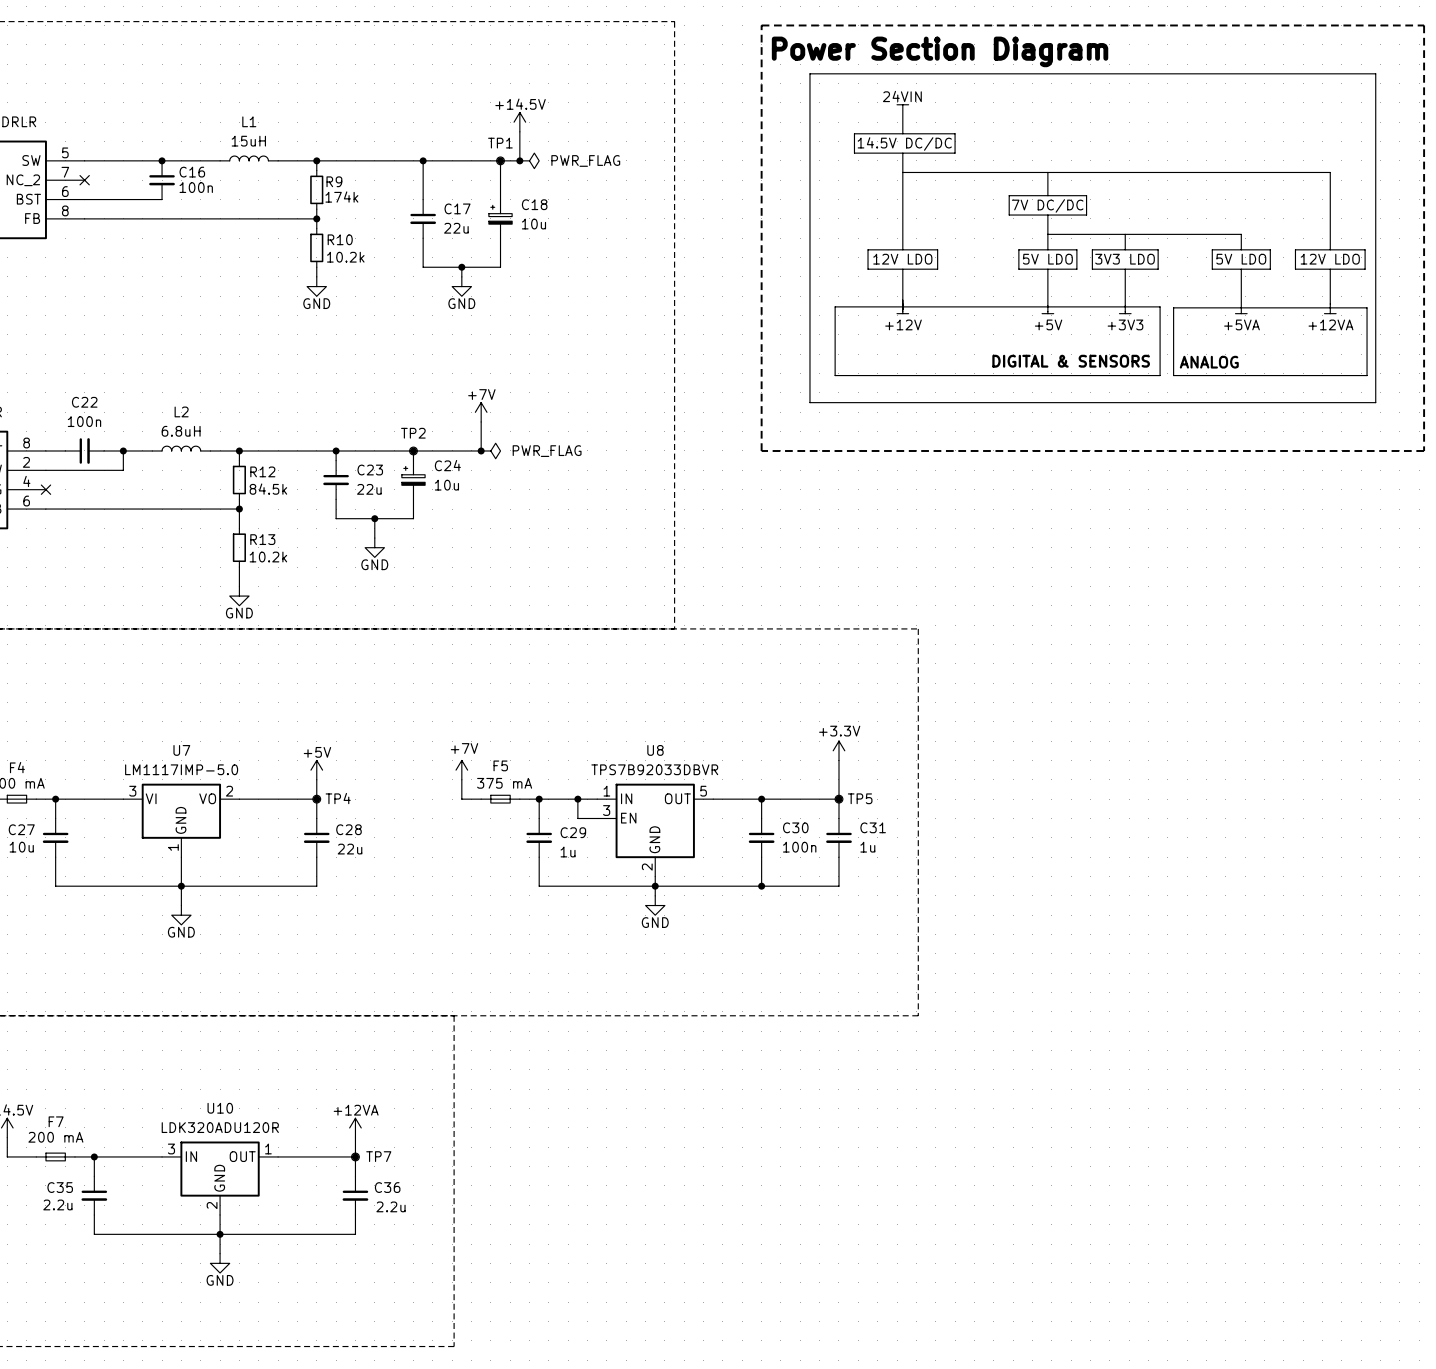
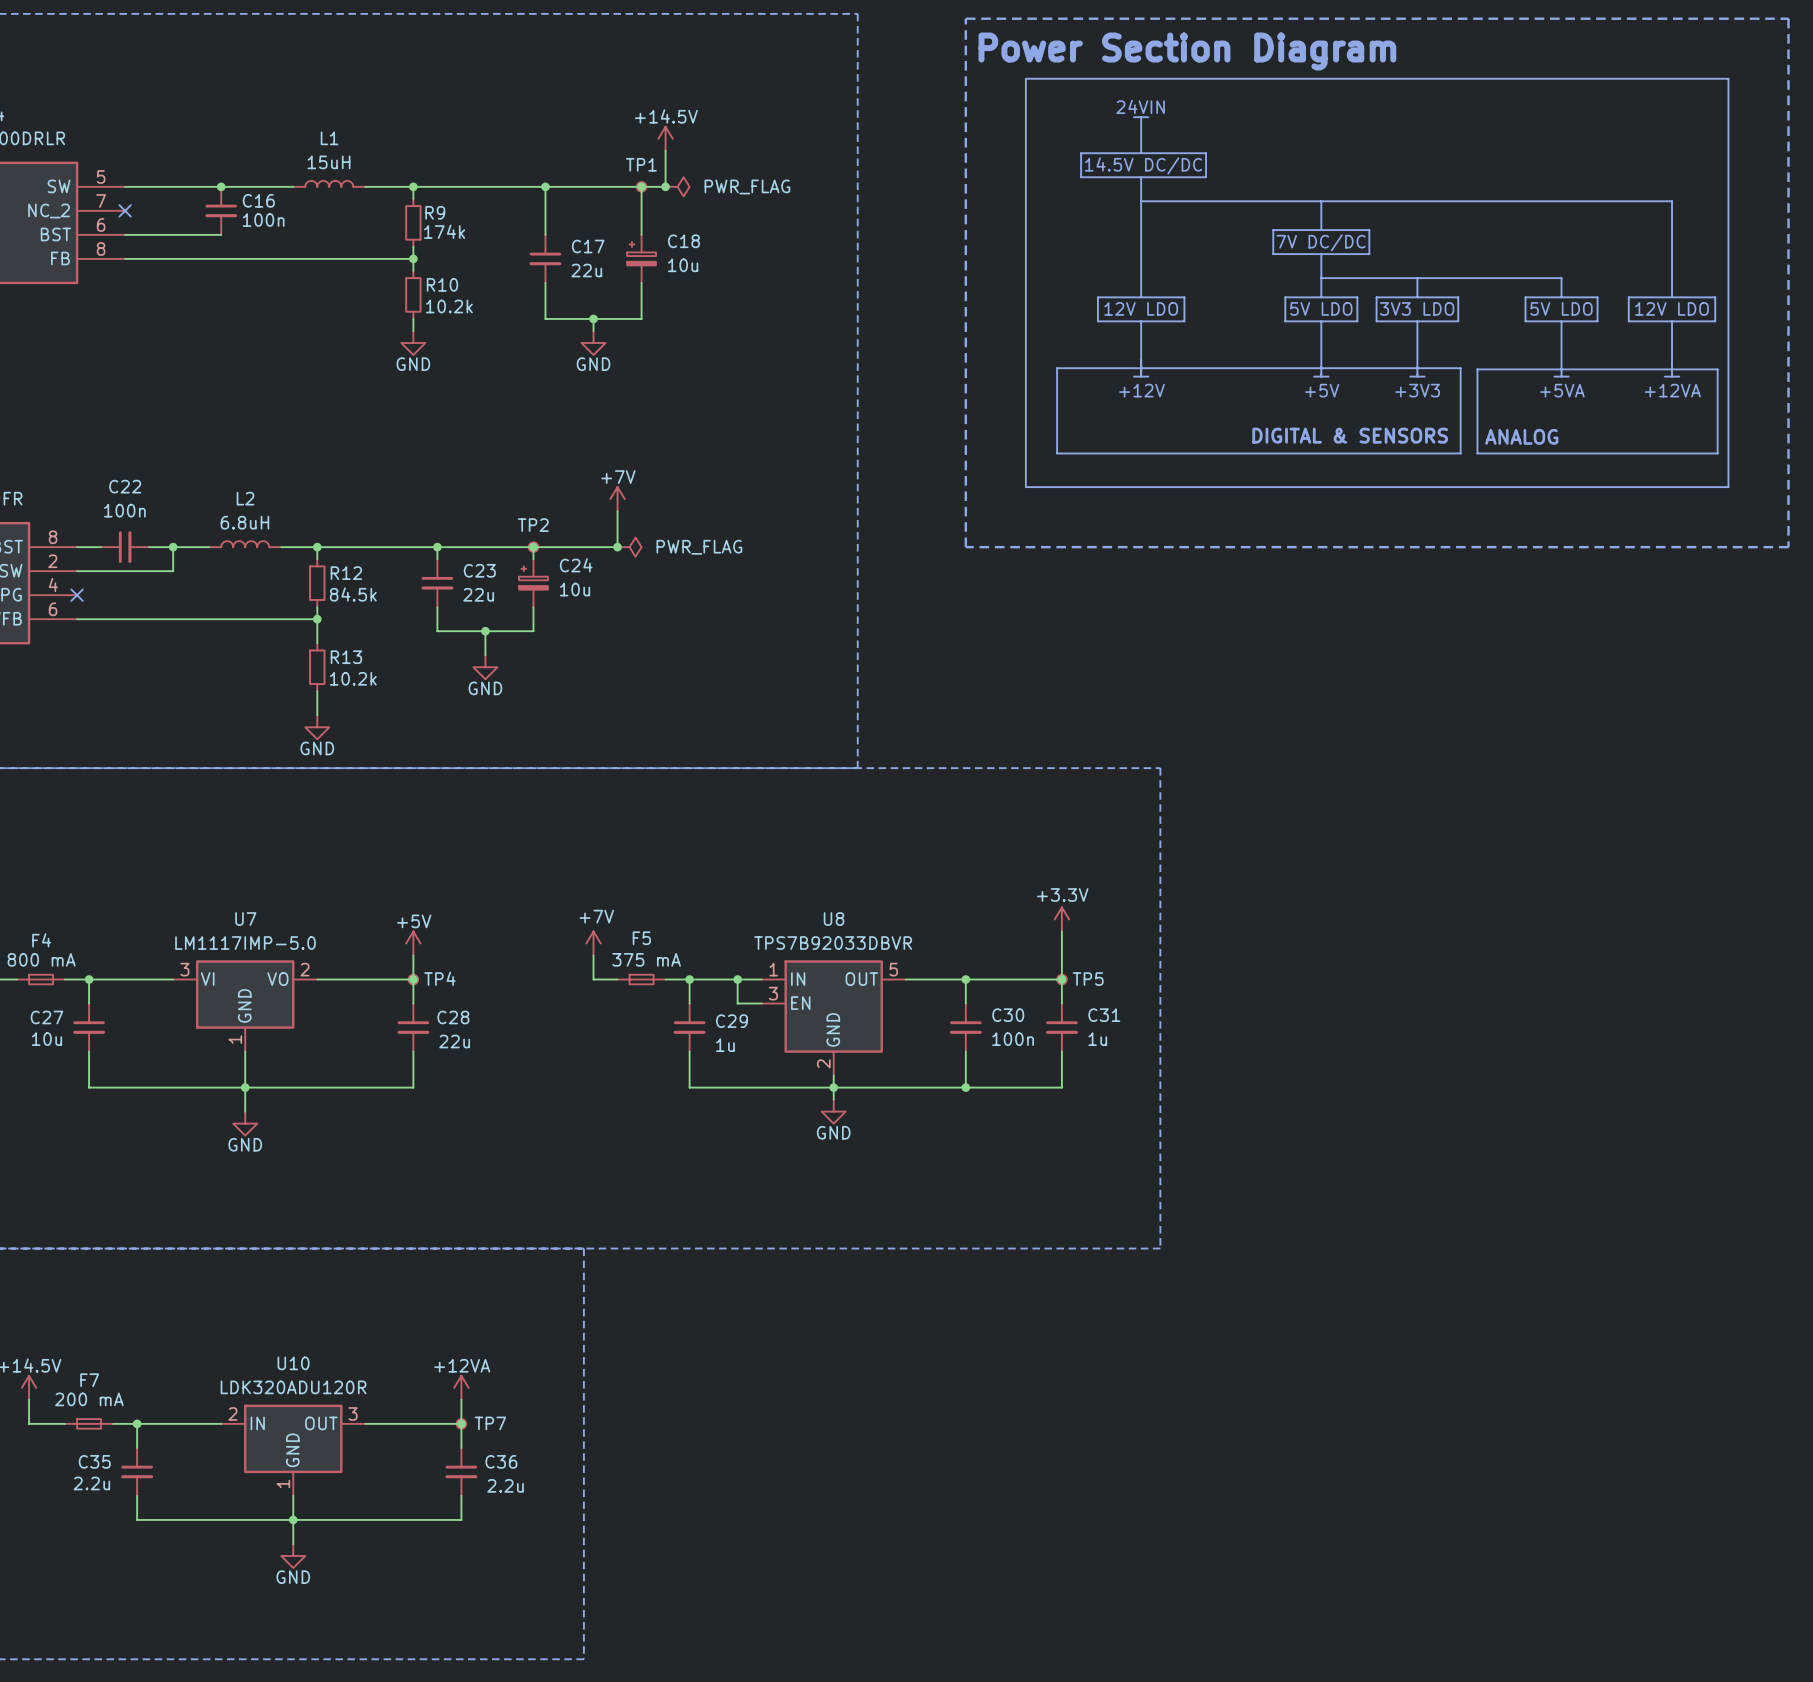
U10 pin number: 3 (171, 1148) -> 2 (232, 1413)
U10 pin number: 1 (268, 1148) -> 3 (353, 1413)
U10 pin number: 2 (212, 1205) -> 1 (283, 1483)

